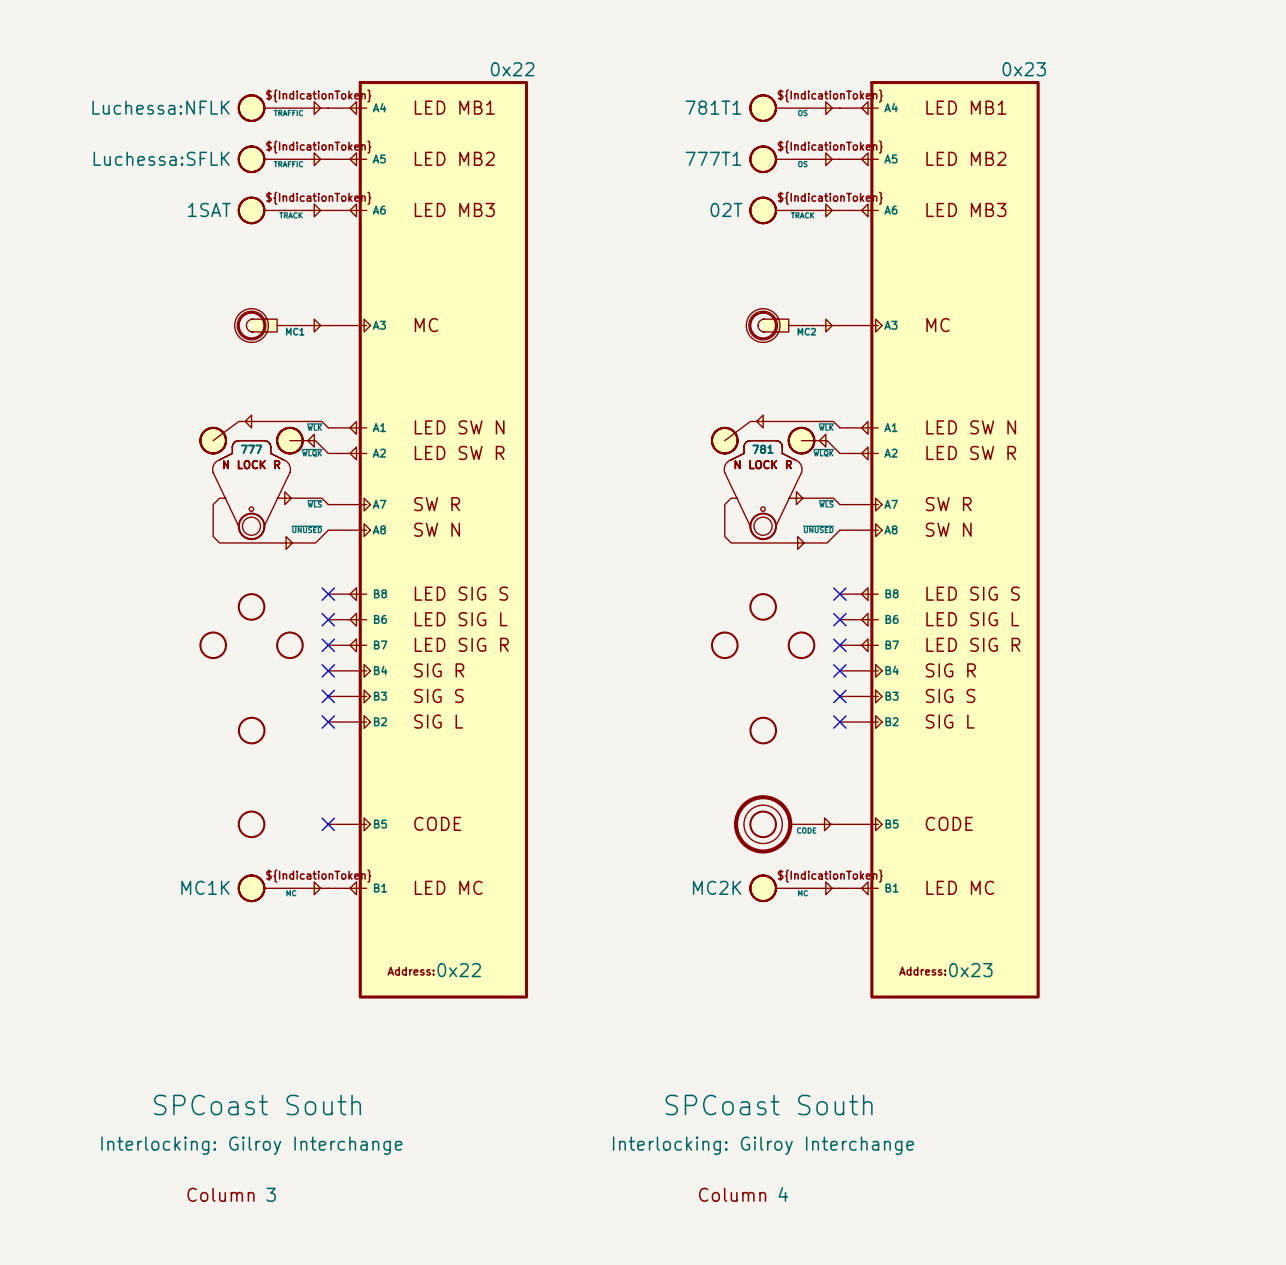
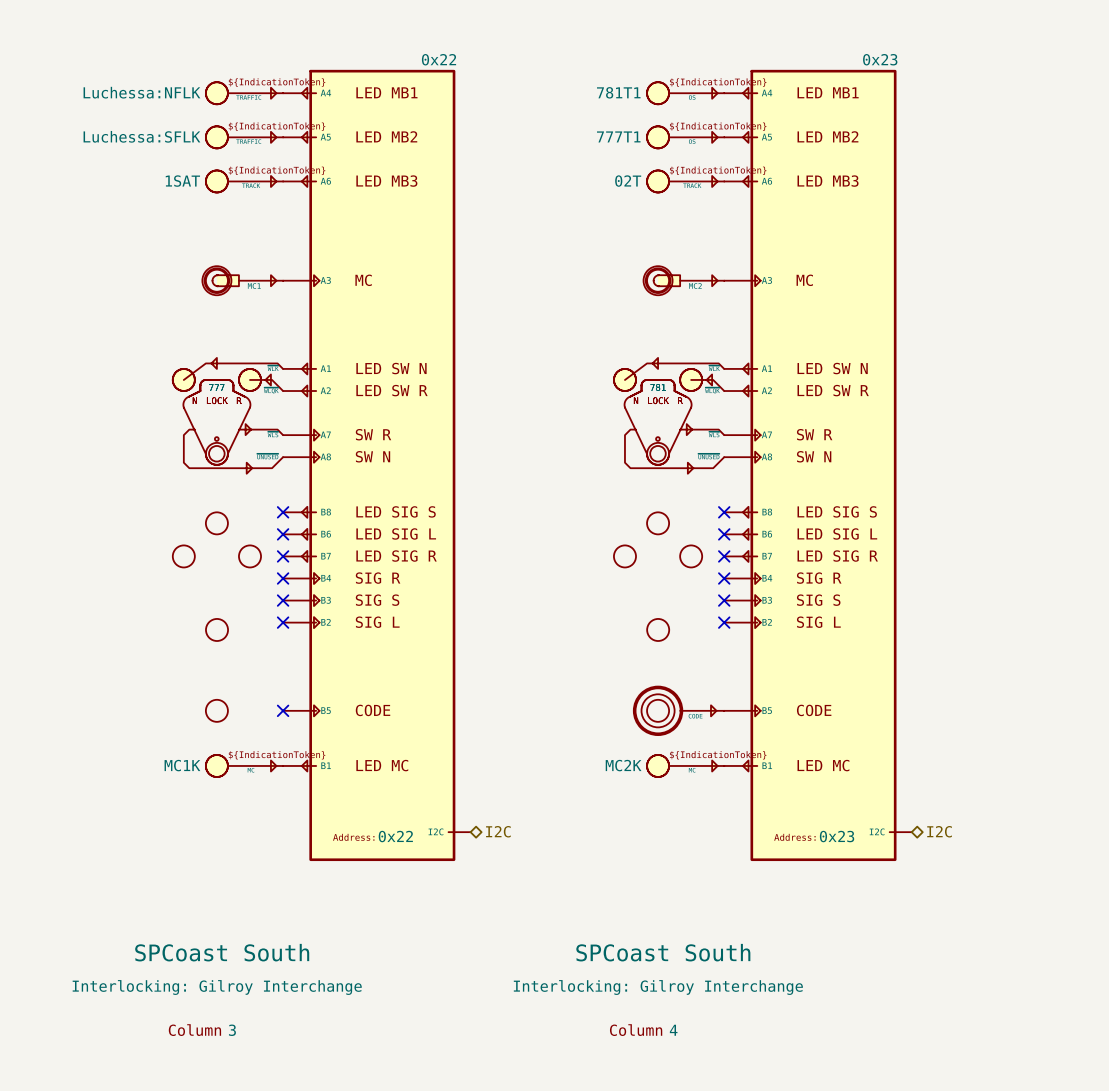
part symbol: [328, 81, 529, 999] -> [283, 69, 471, 862]
part symbol: [839, 81, 1040, 999] -> [724, 69, 912, 862]
hierarchical label: none -> I2C (498, 831)
hierarchical label: none -> I2C (939, 831)

